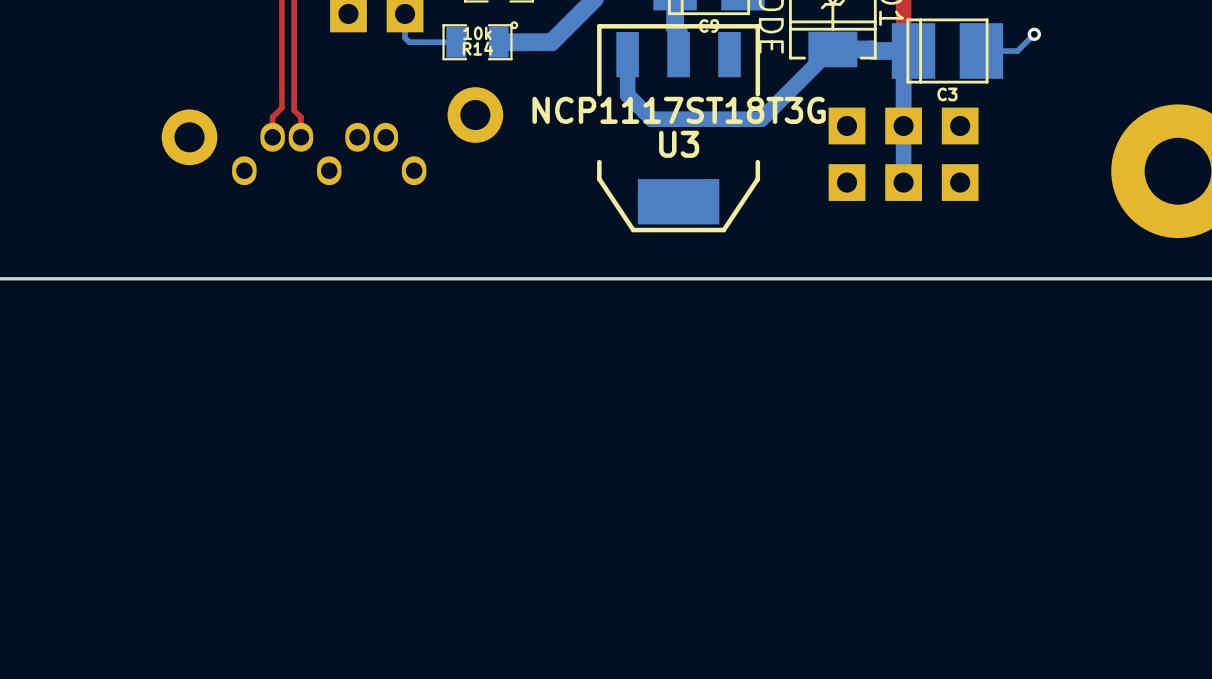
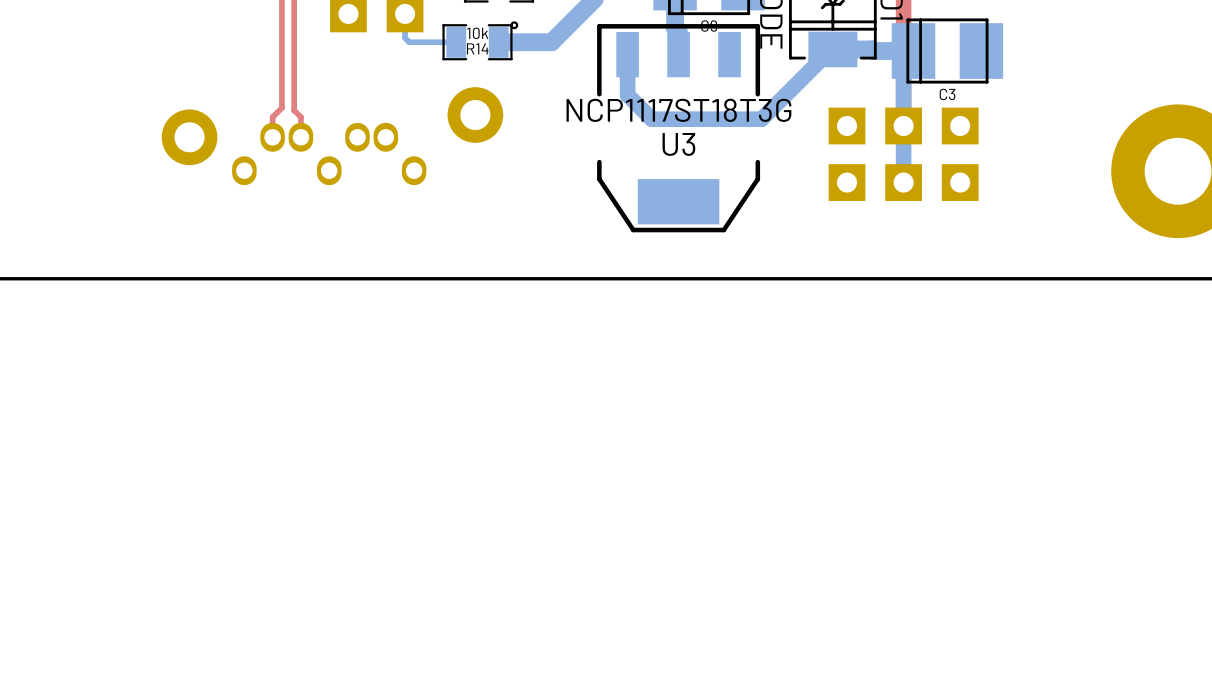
bottom track: (1034, 34) (1017, 51) (981, 51) -> none
via: (1034, 34) -> none

